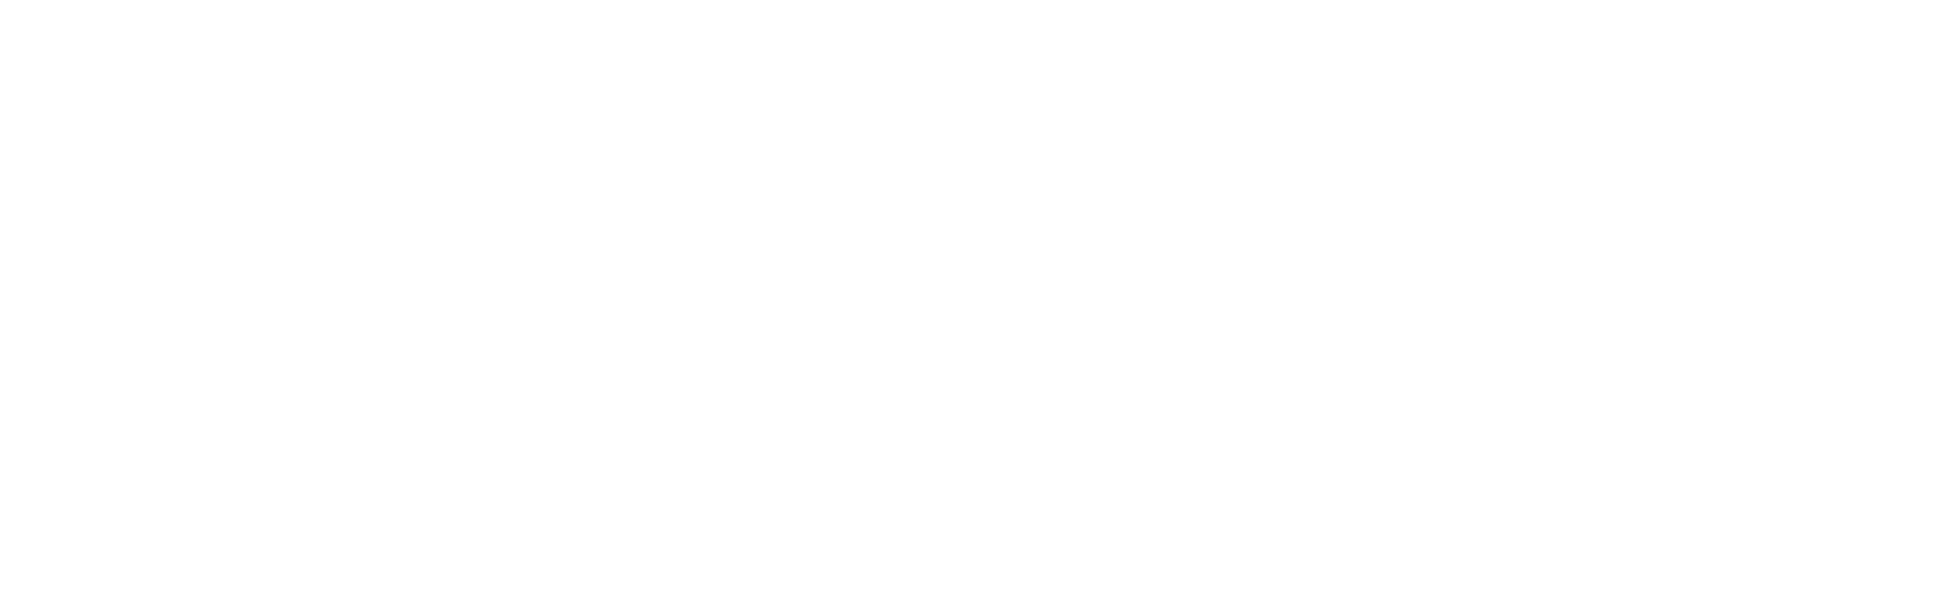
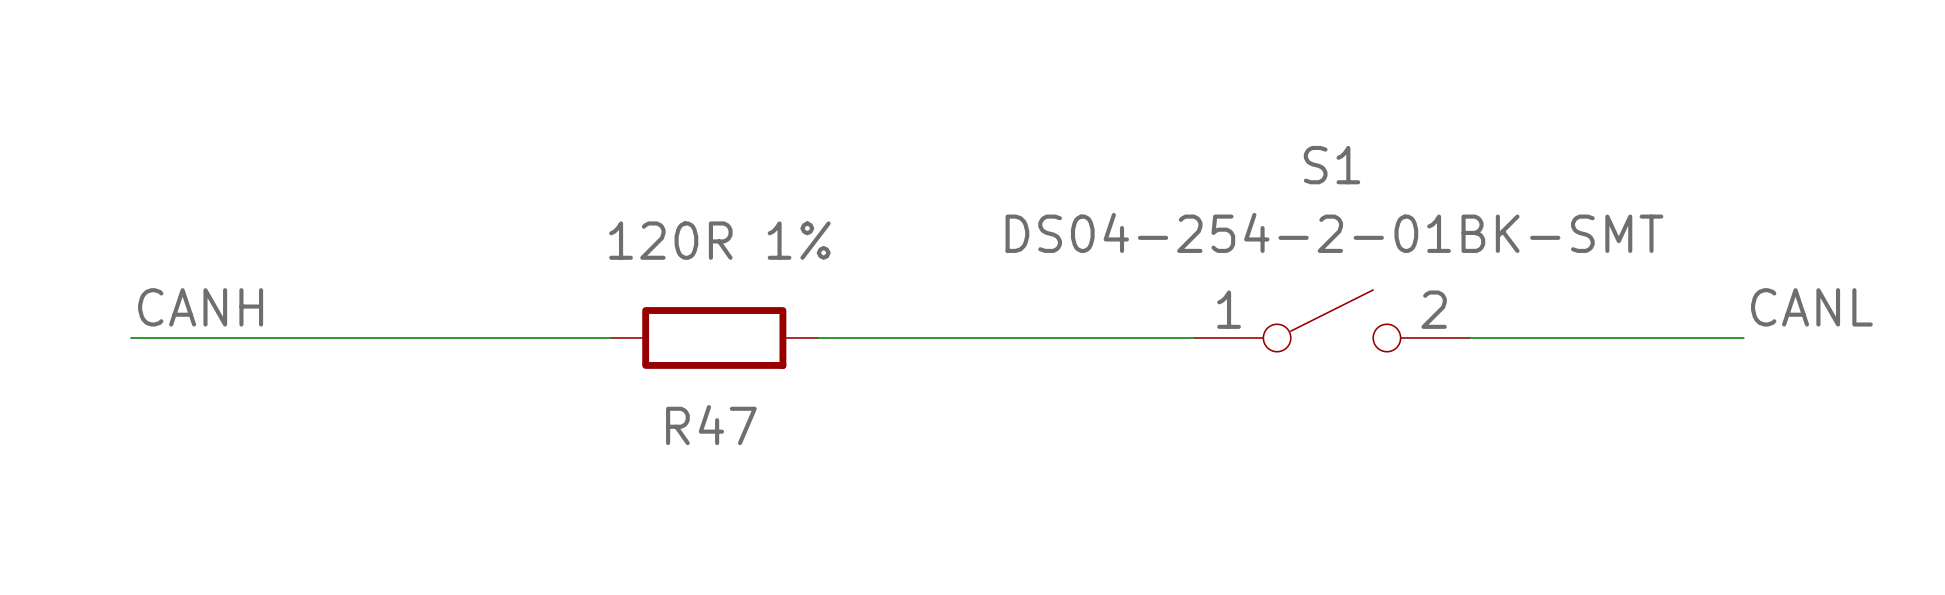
label: none -> CANH (200, 307)
label: none -> CANL (1811, 307)
S1: none -> DS04-254-2-01BK-SMT (1332, 320)
wire: none -> (130, 337) (611, 337)
R47: none -> 120R 1% (714, 337)
wire: none -> (817, 337) (1194, 337)
wire: none -> (1469, 337) (1743, 337)

